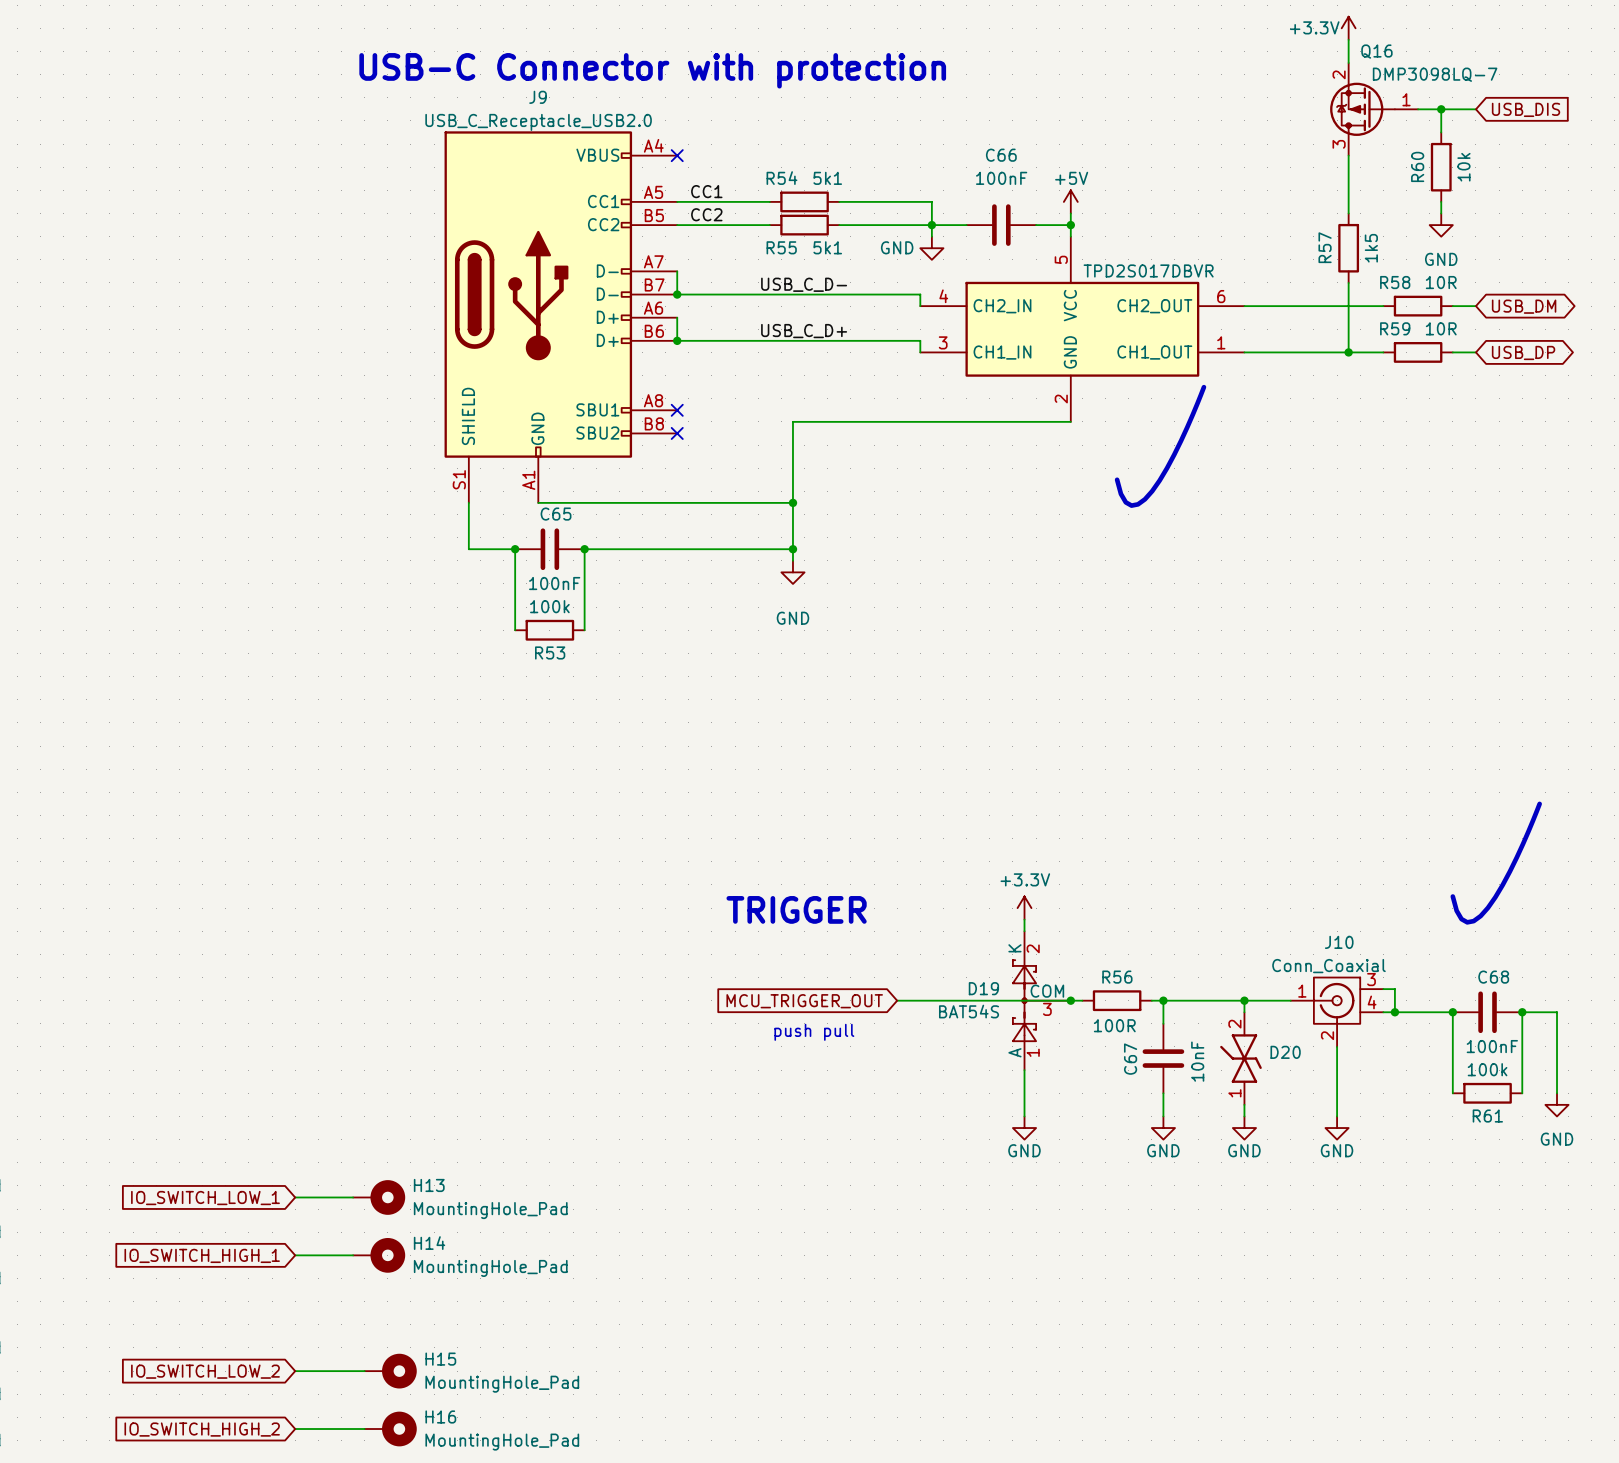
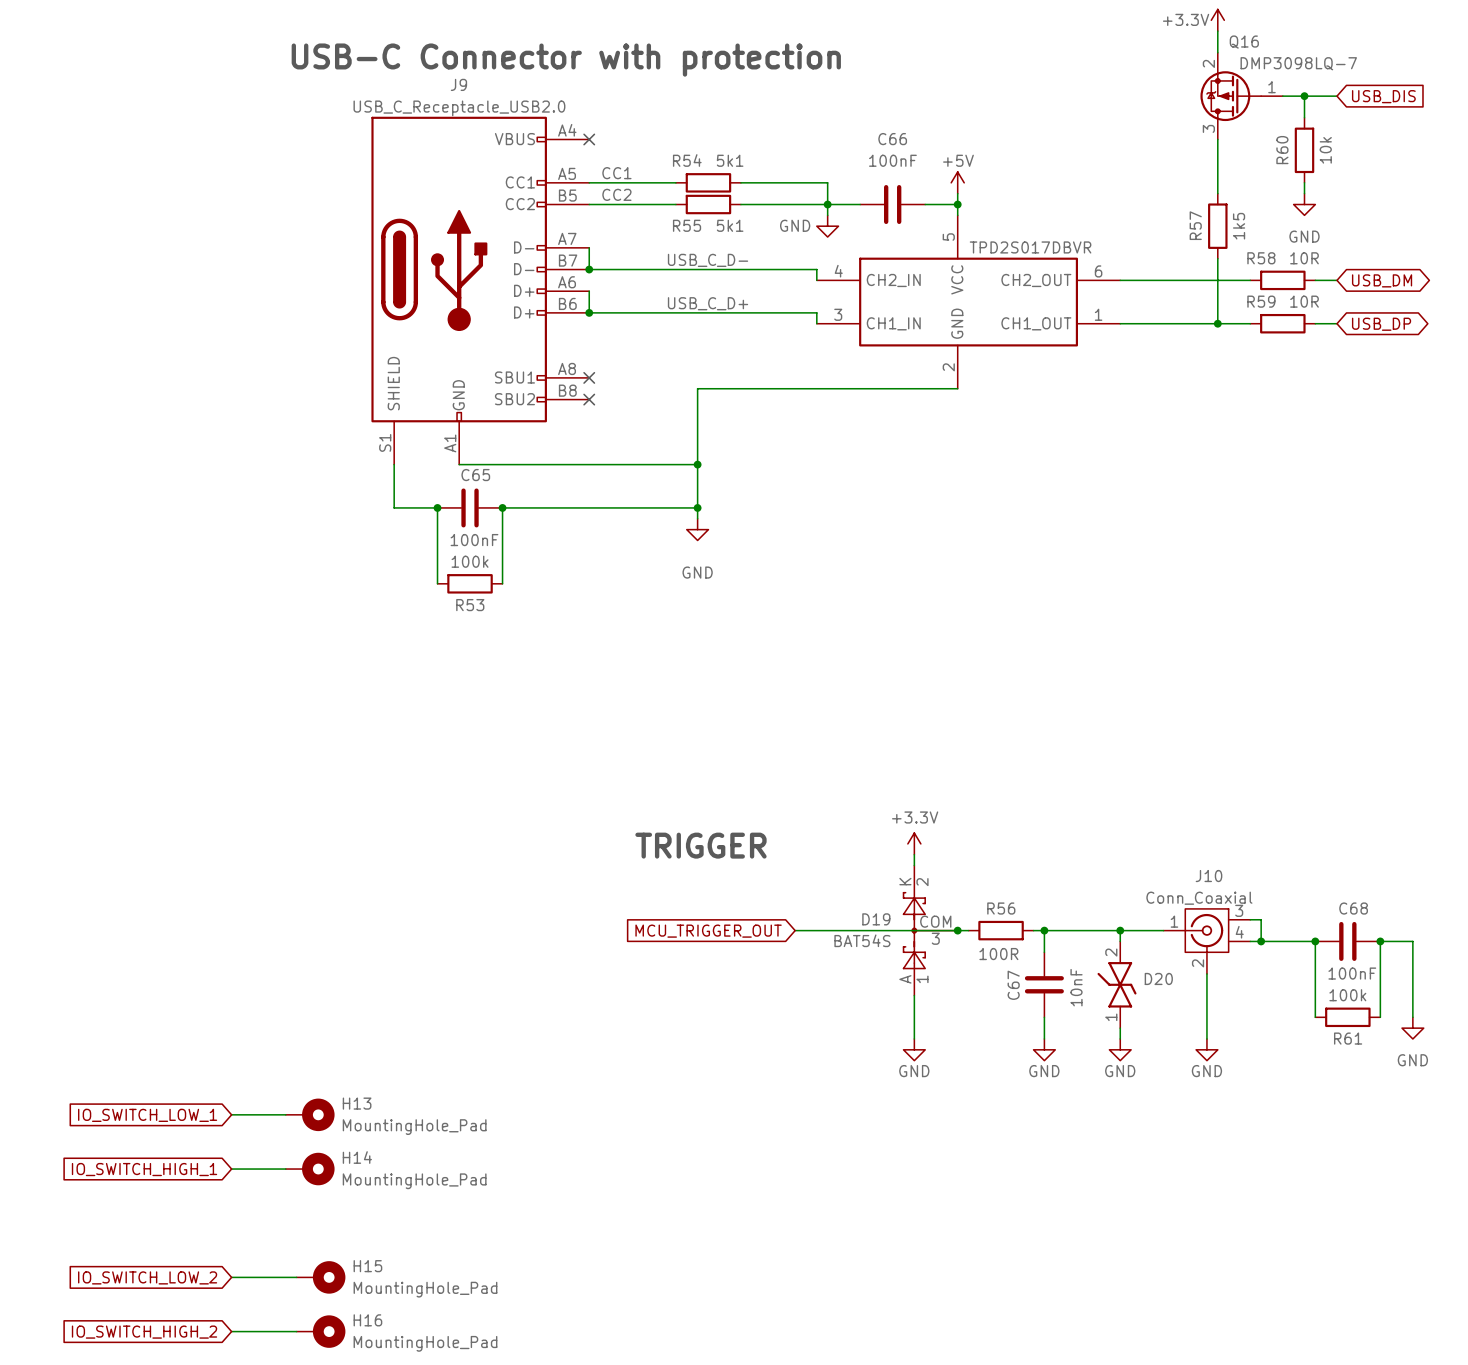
line: (1203, 387) (1174, 454) (1159, 480) (1144, 499) (1138, 504) (1131, 505) (1125, 502) (1120, 493) (1117, 479) -> none
line: (1539, 803) (1509, 871) (1495, 897) (1480, 916) (1473, 921) (1467, 922) (1461, 919) (1456, 910) (1452, 896) -> none
text: push pull (814, 1032) -> none

